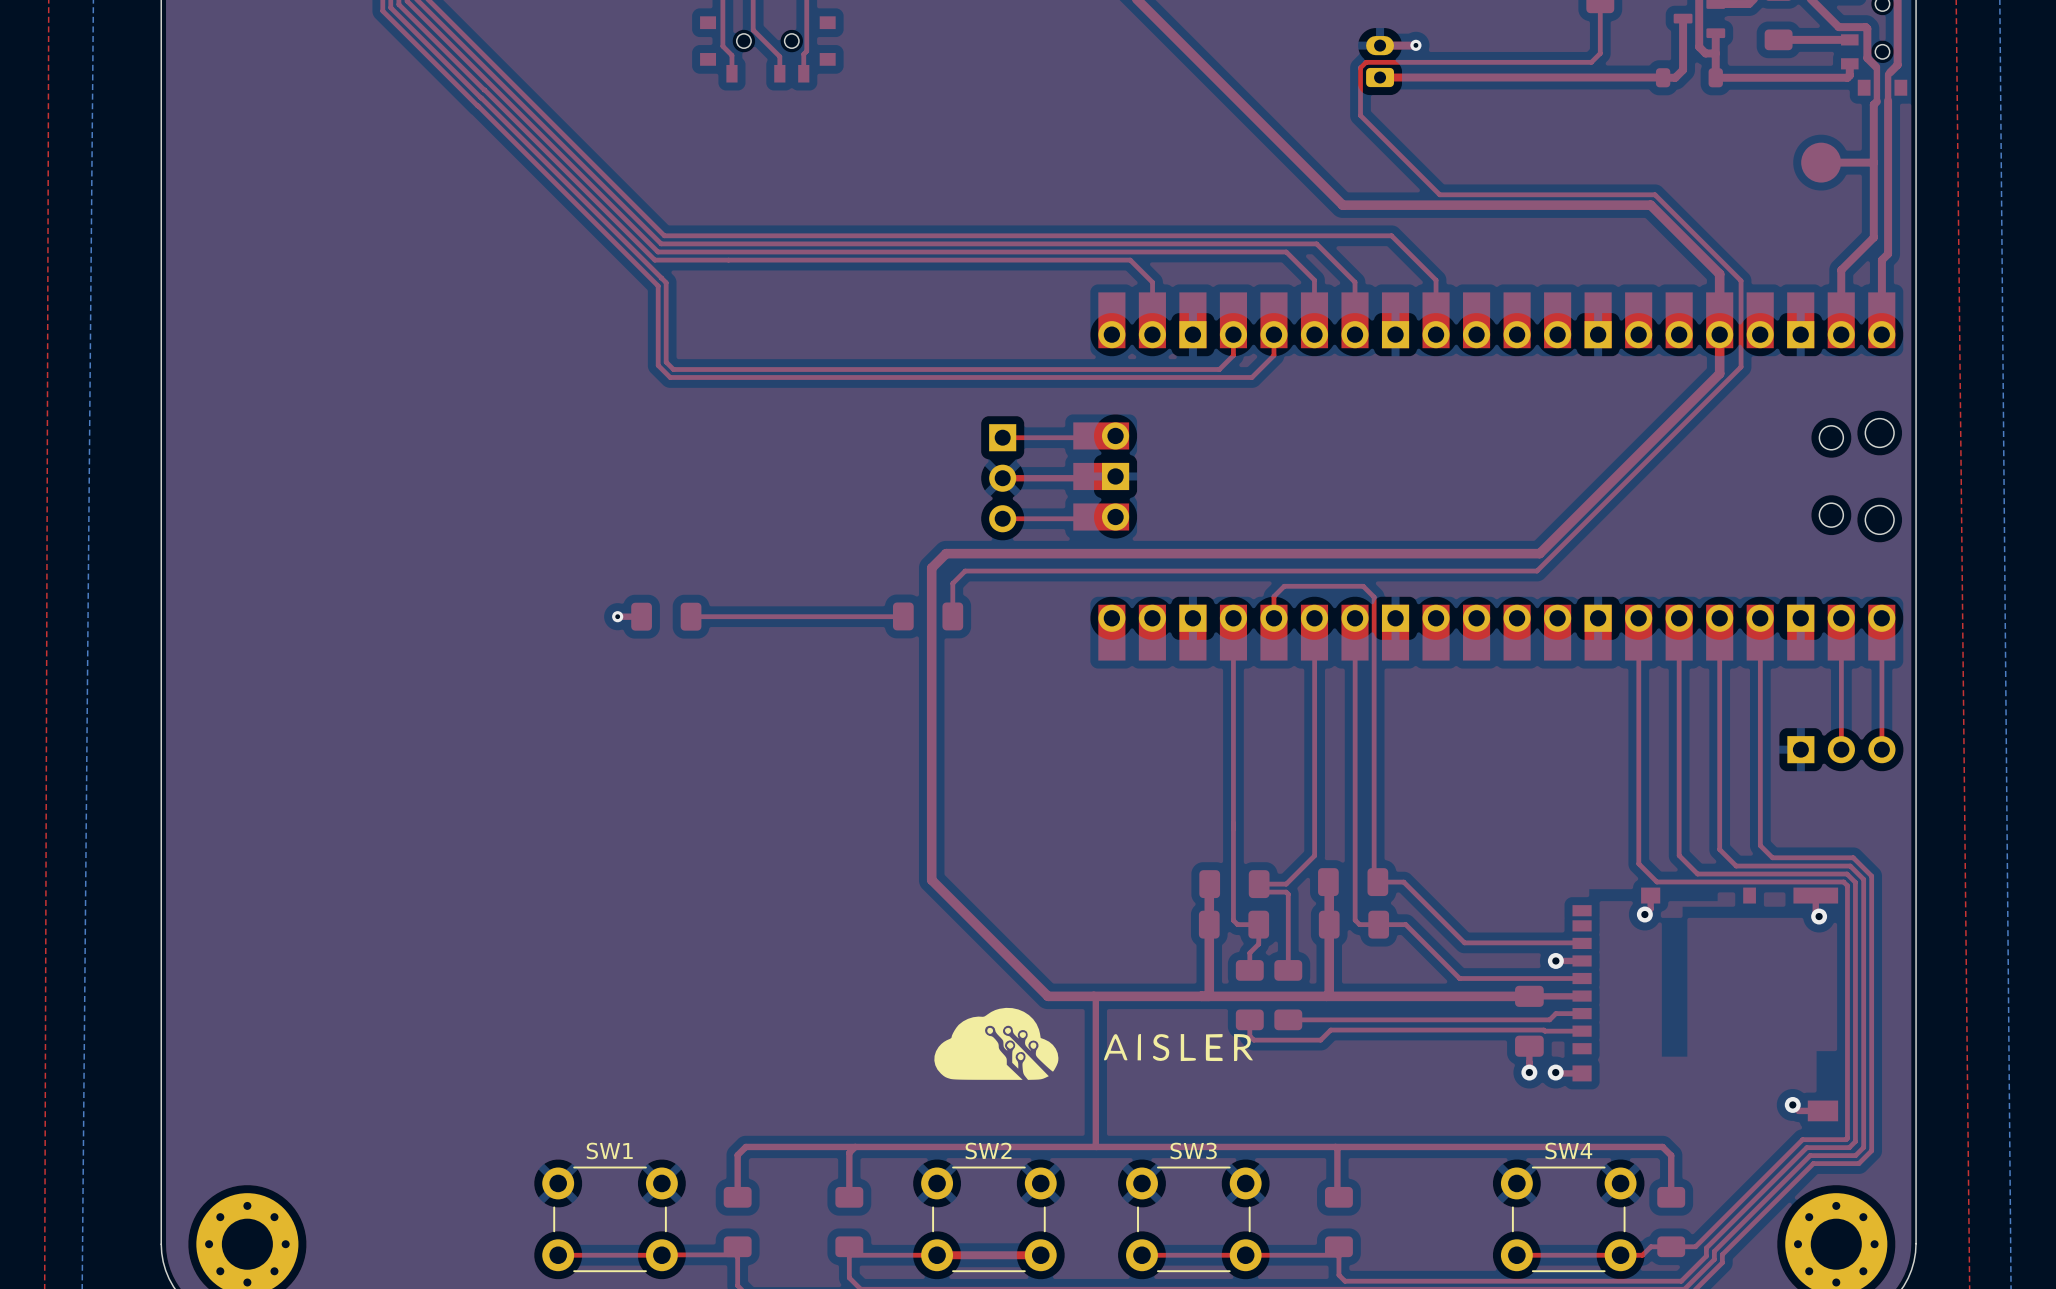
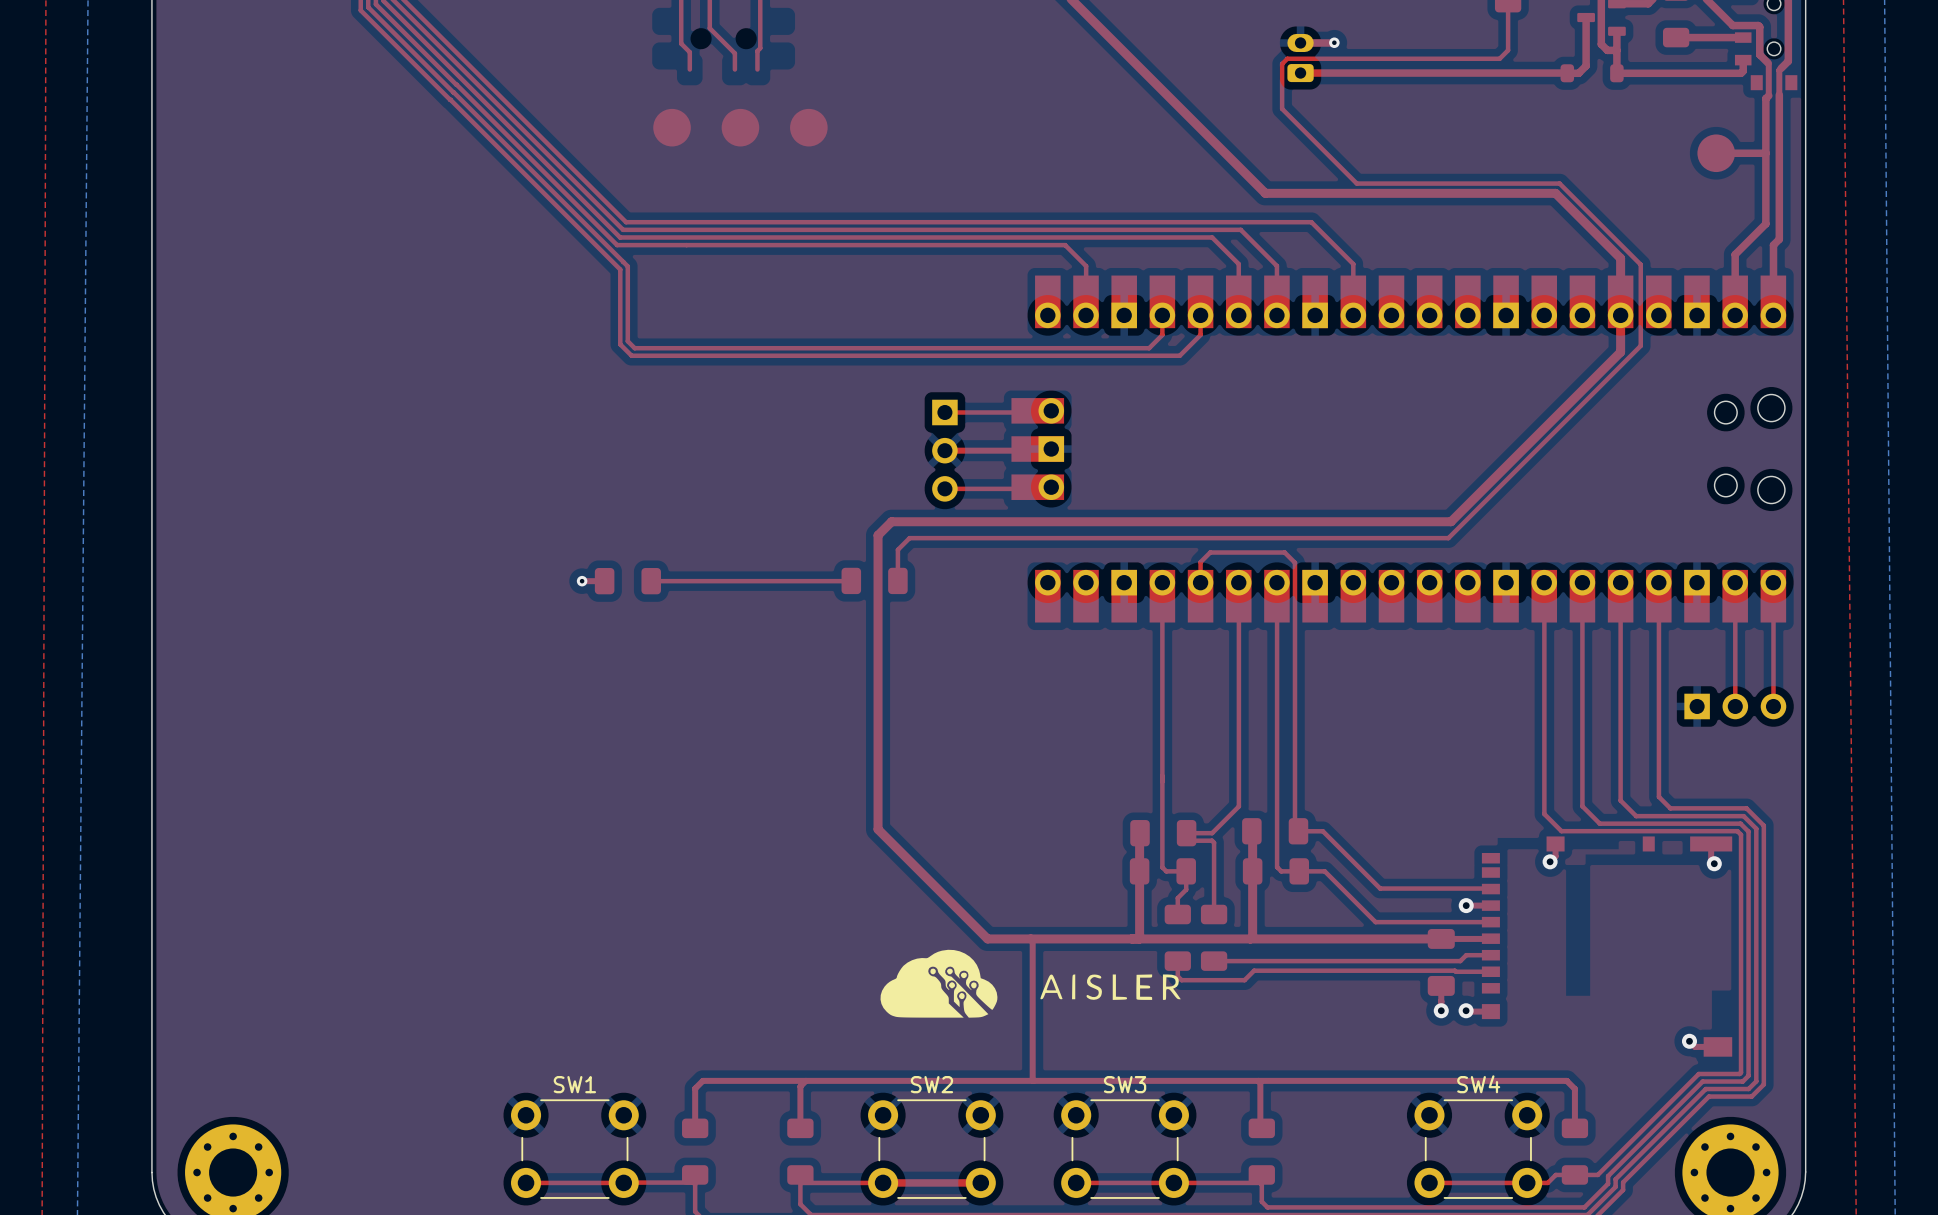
part: (767, 49) -> none
part: none -> (672, 127)
part: none -> (740, 127)
part: none -> (808, 127)

